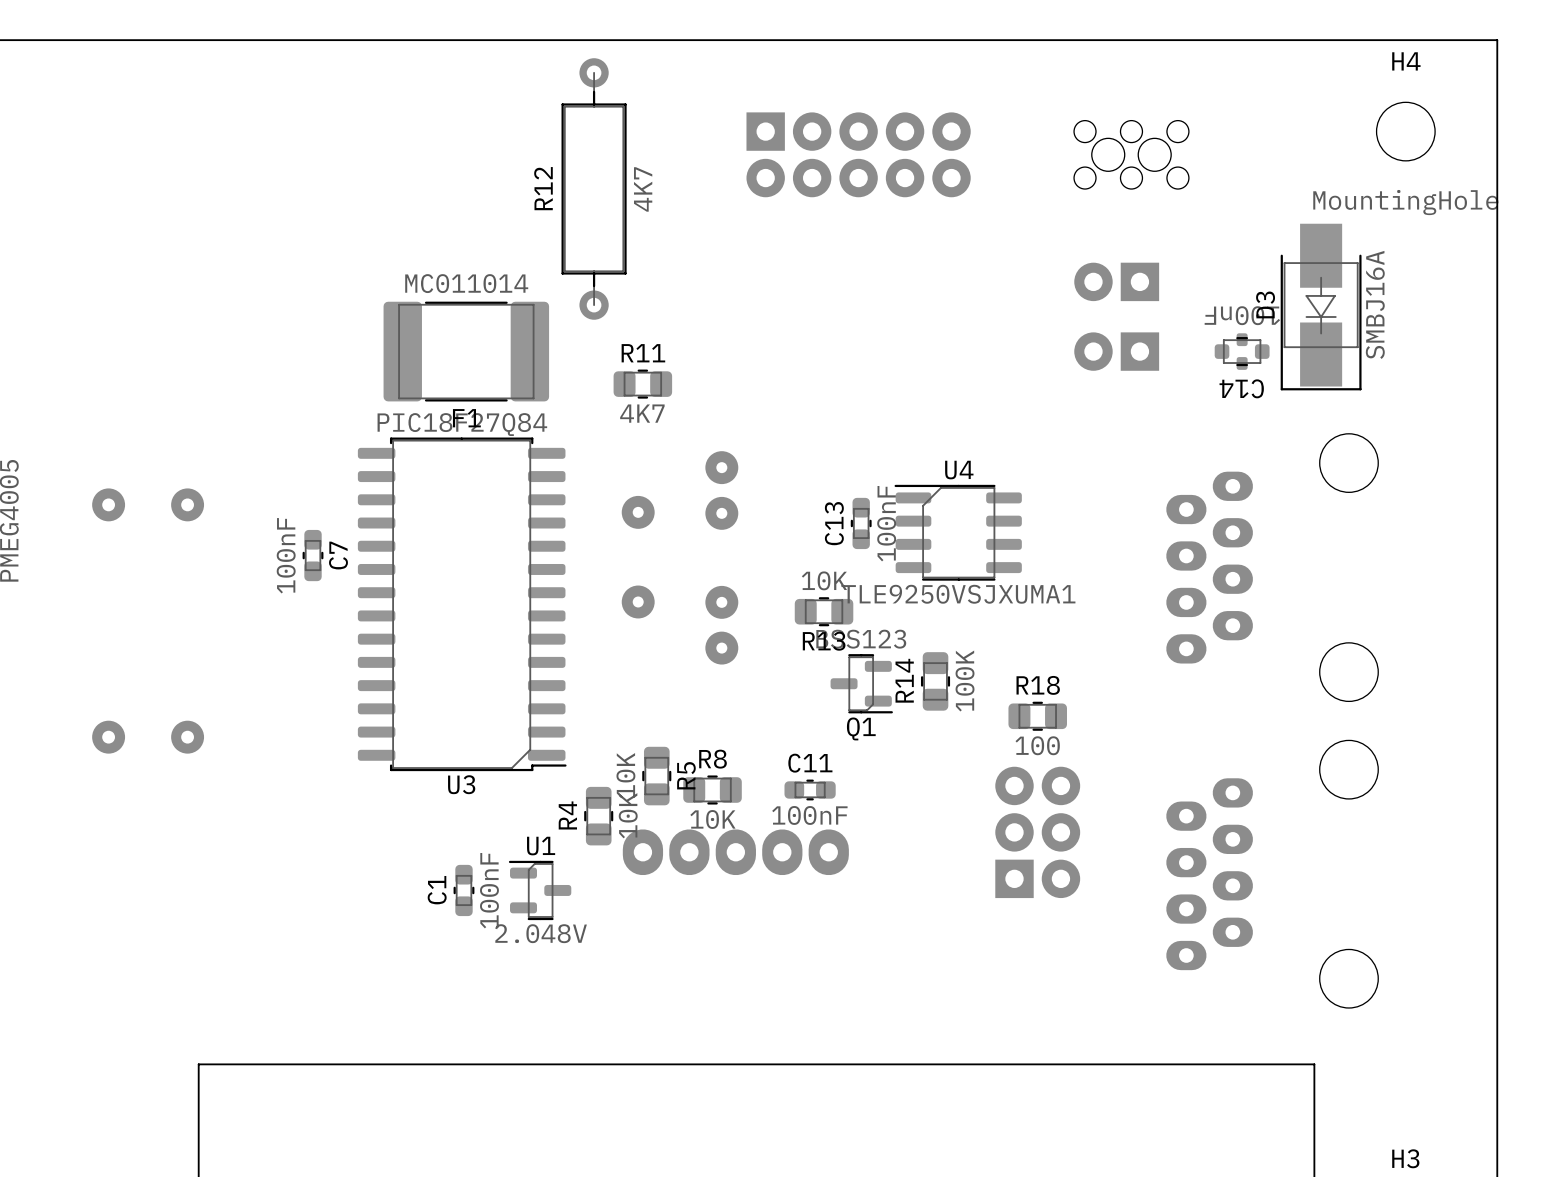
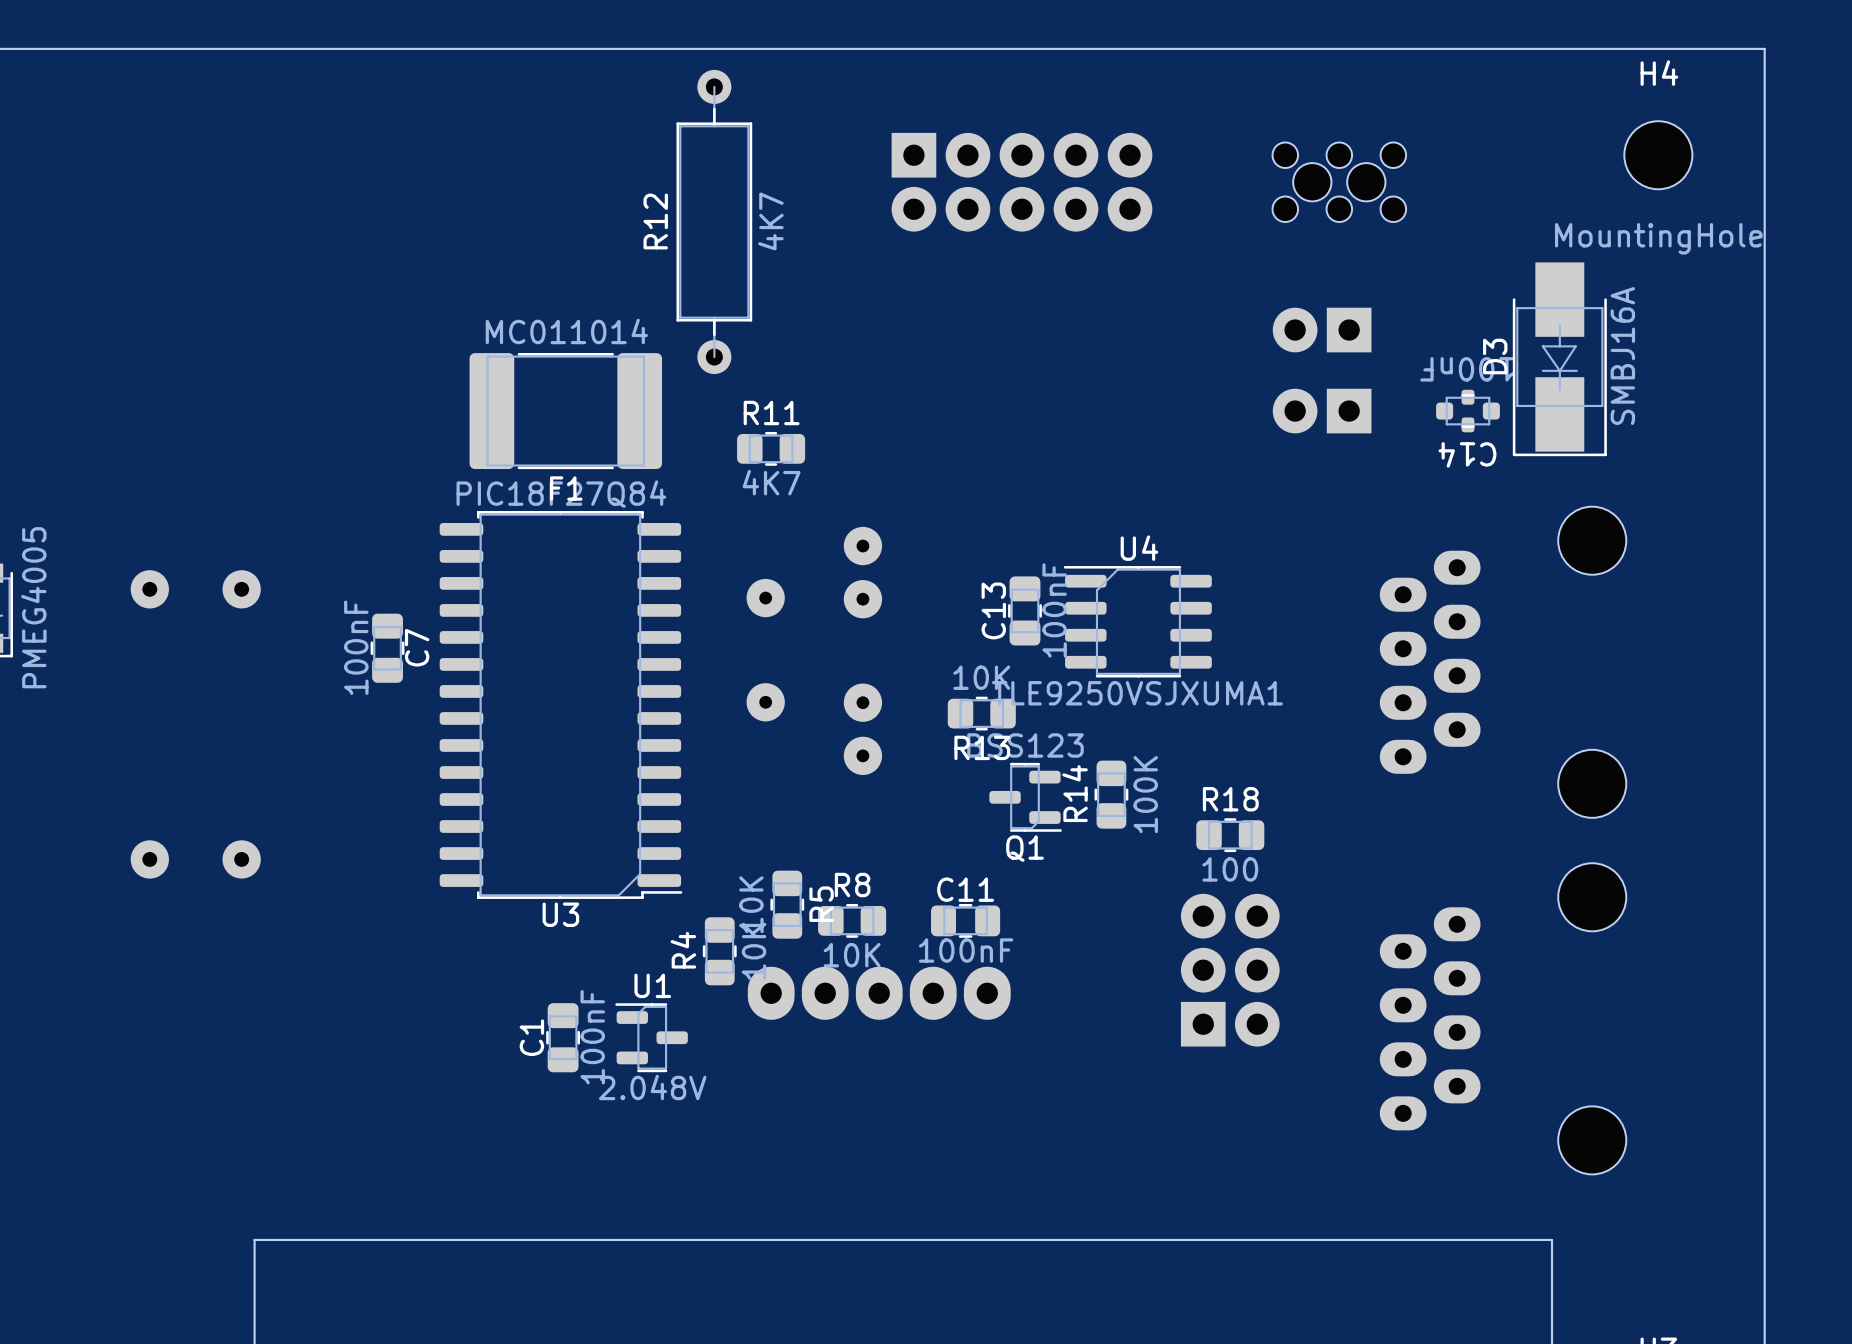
C13 footprint: [850, 497, 872, 550] -> [1008, 576, 1042, 646]
C7 footprint: [302, 529, 324, 582] -> [370, 613, 405, 683]
C11 footprint: [784, 779, 836, 801] -> [931, 903, 1001, 938]
C1 footprint: [453, 864, 475, 917] -> [546, 1003, 581, 1073]

